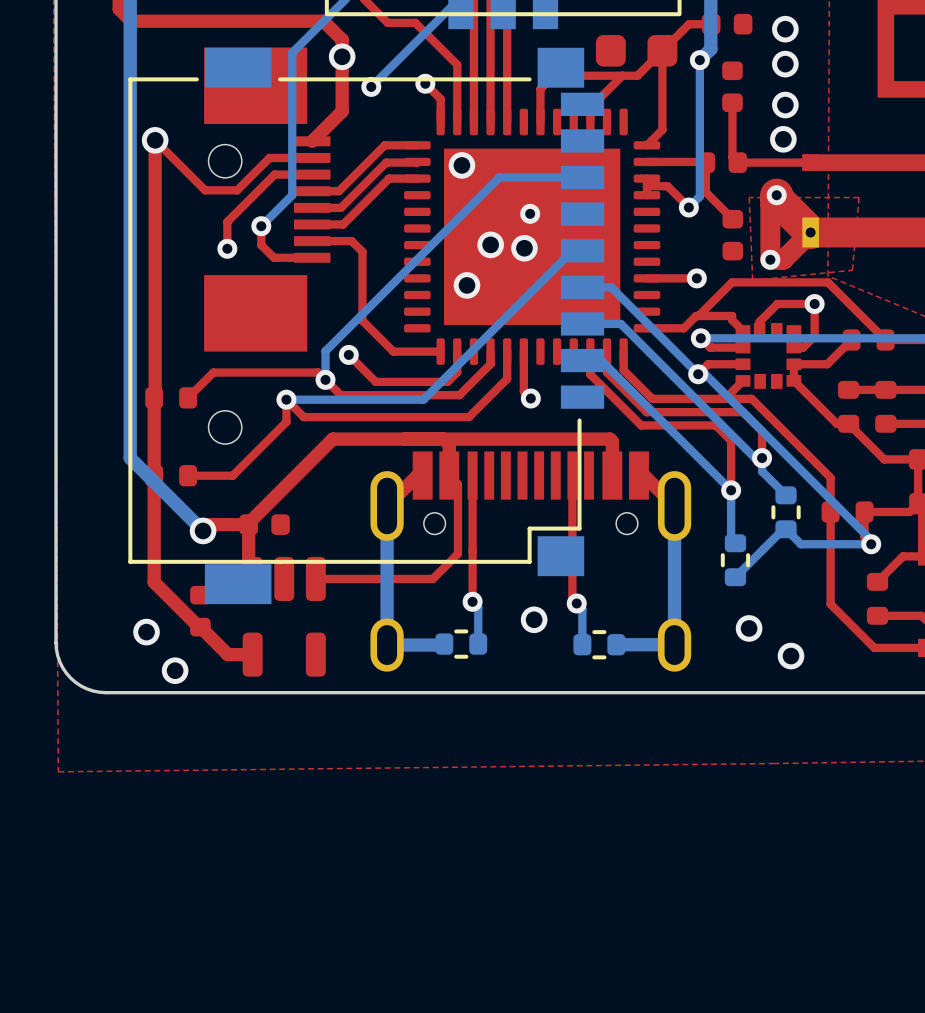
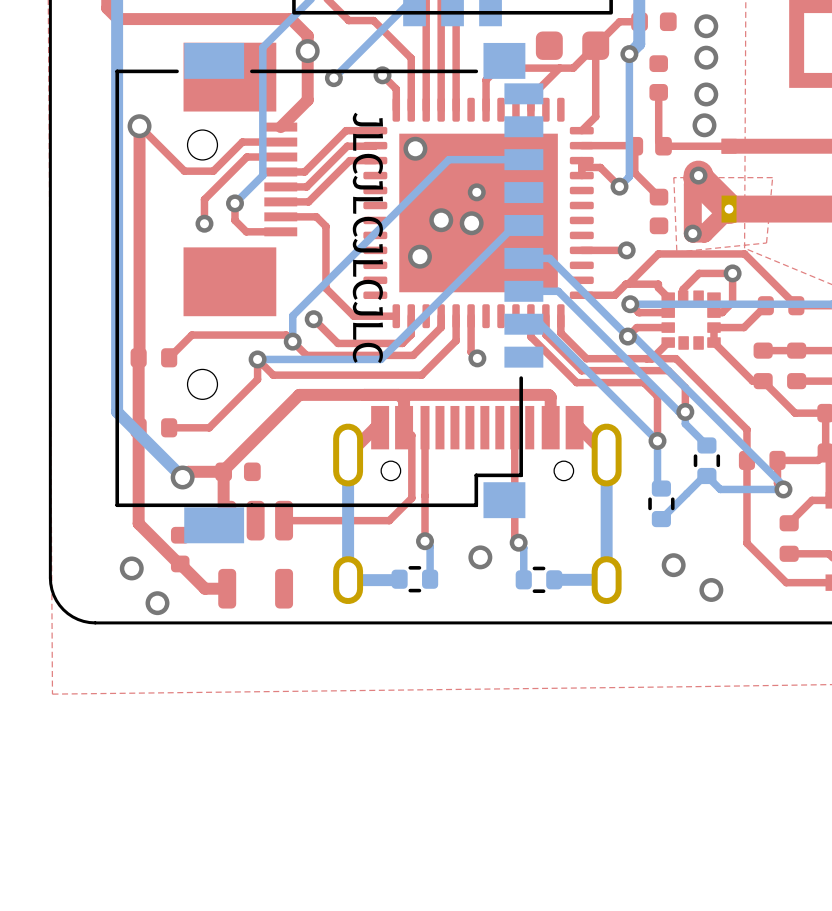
text: none -> JLCJLCJLCJLC (367, 237)

